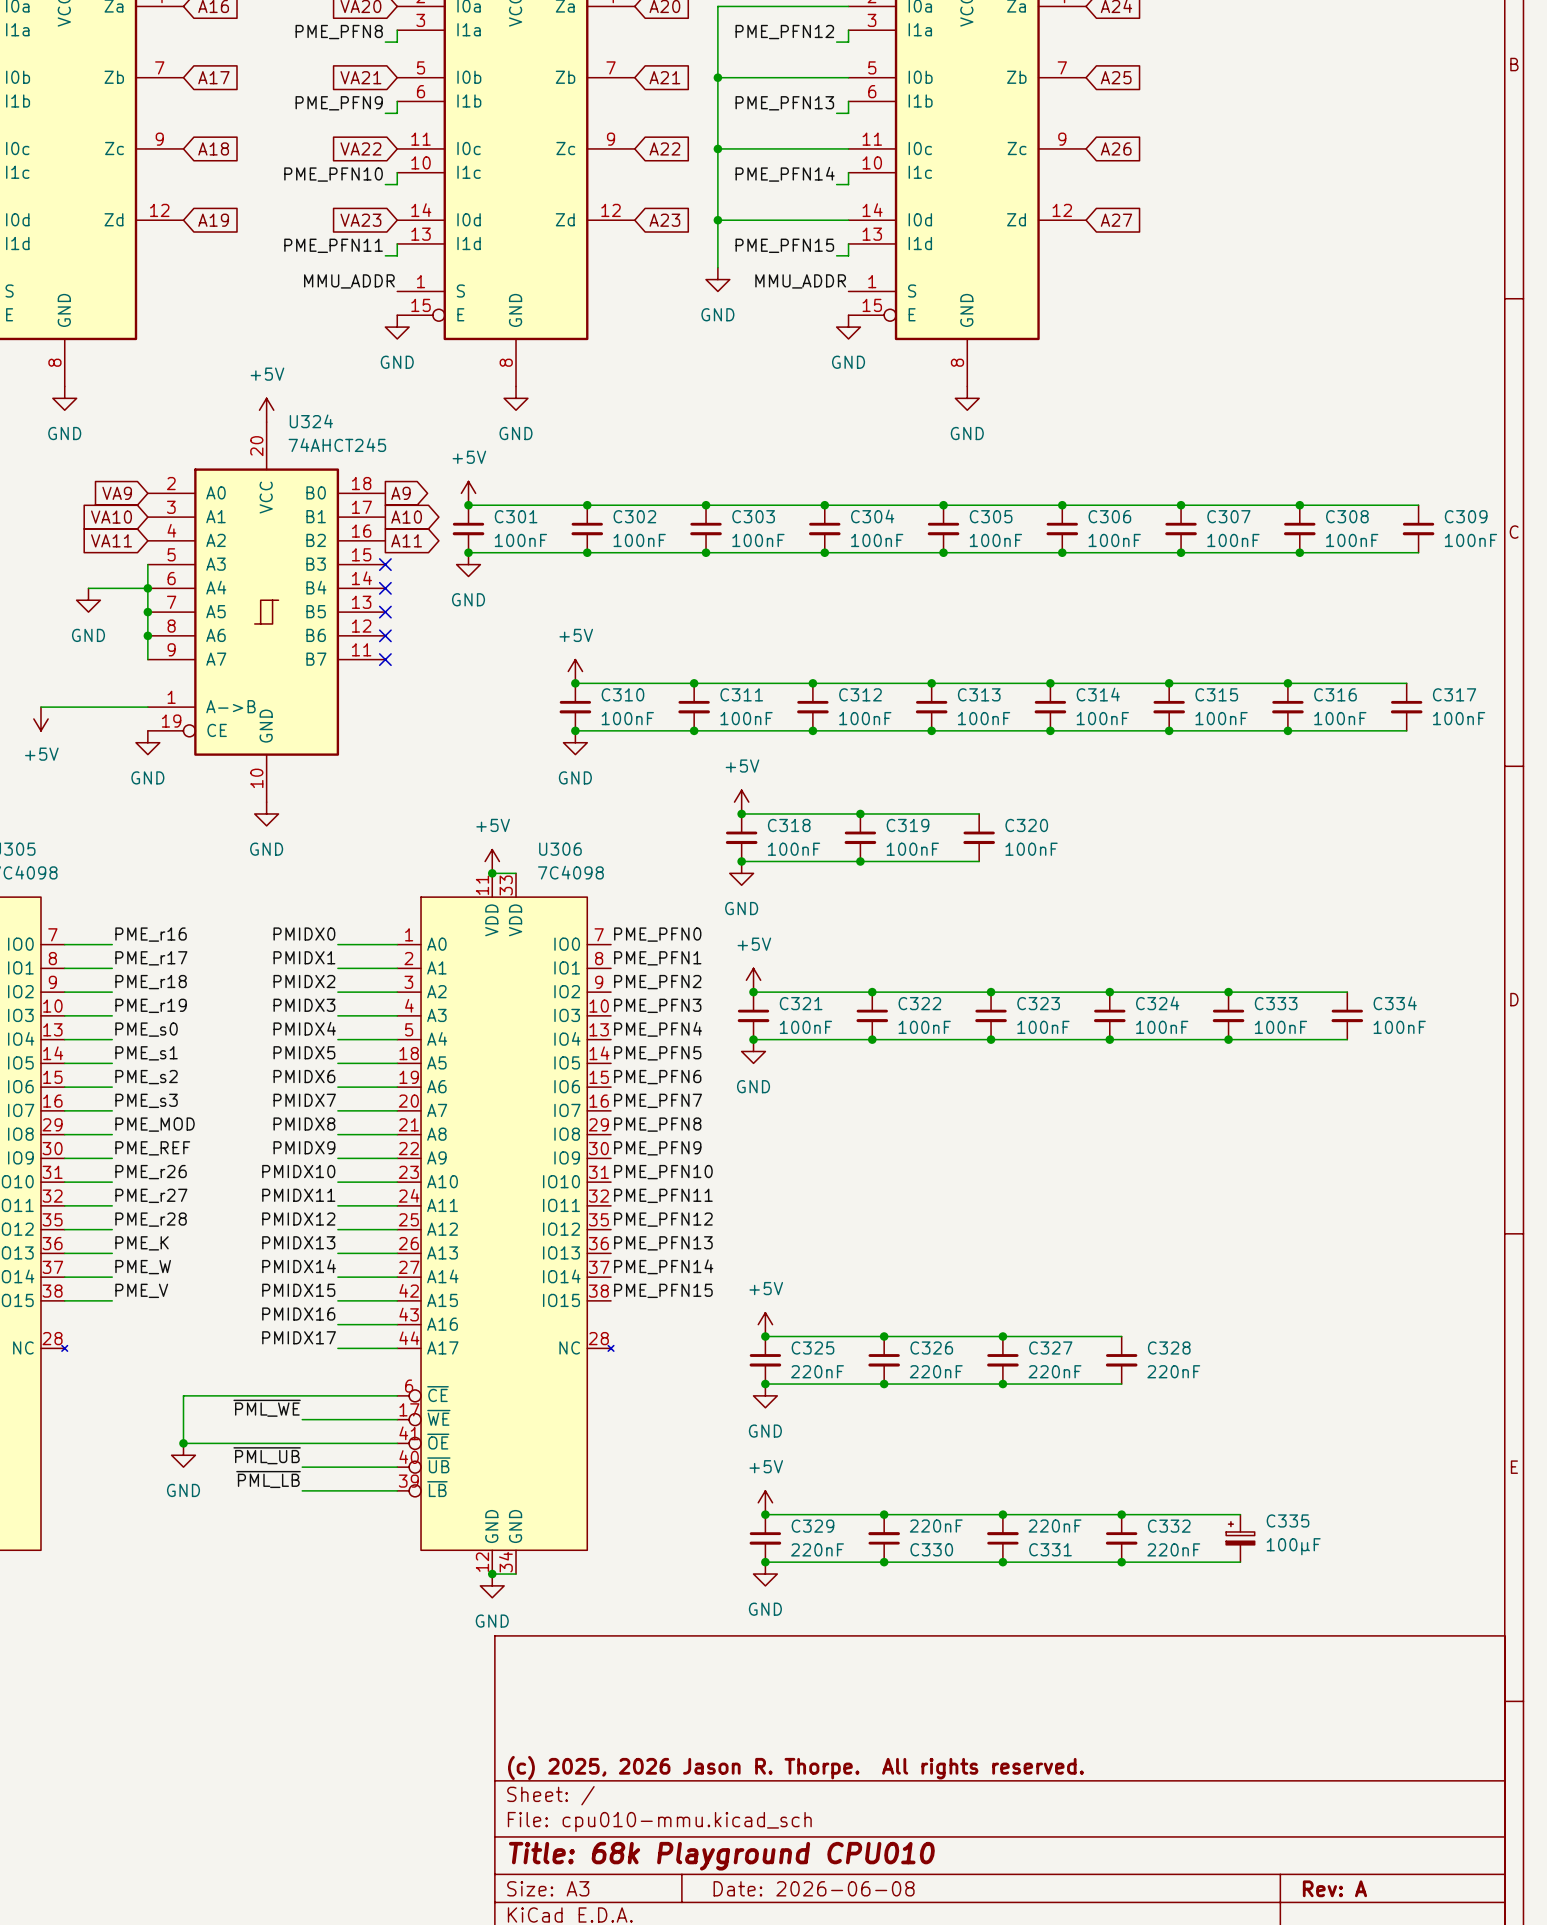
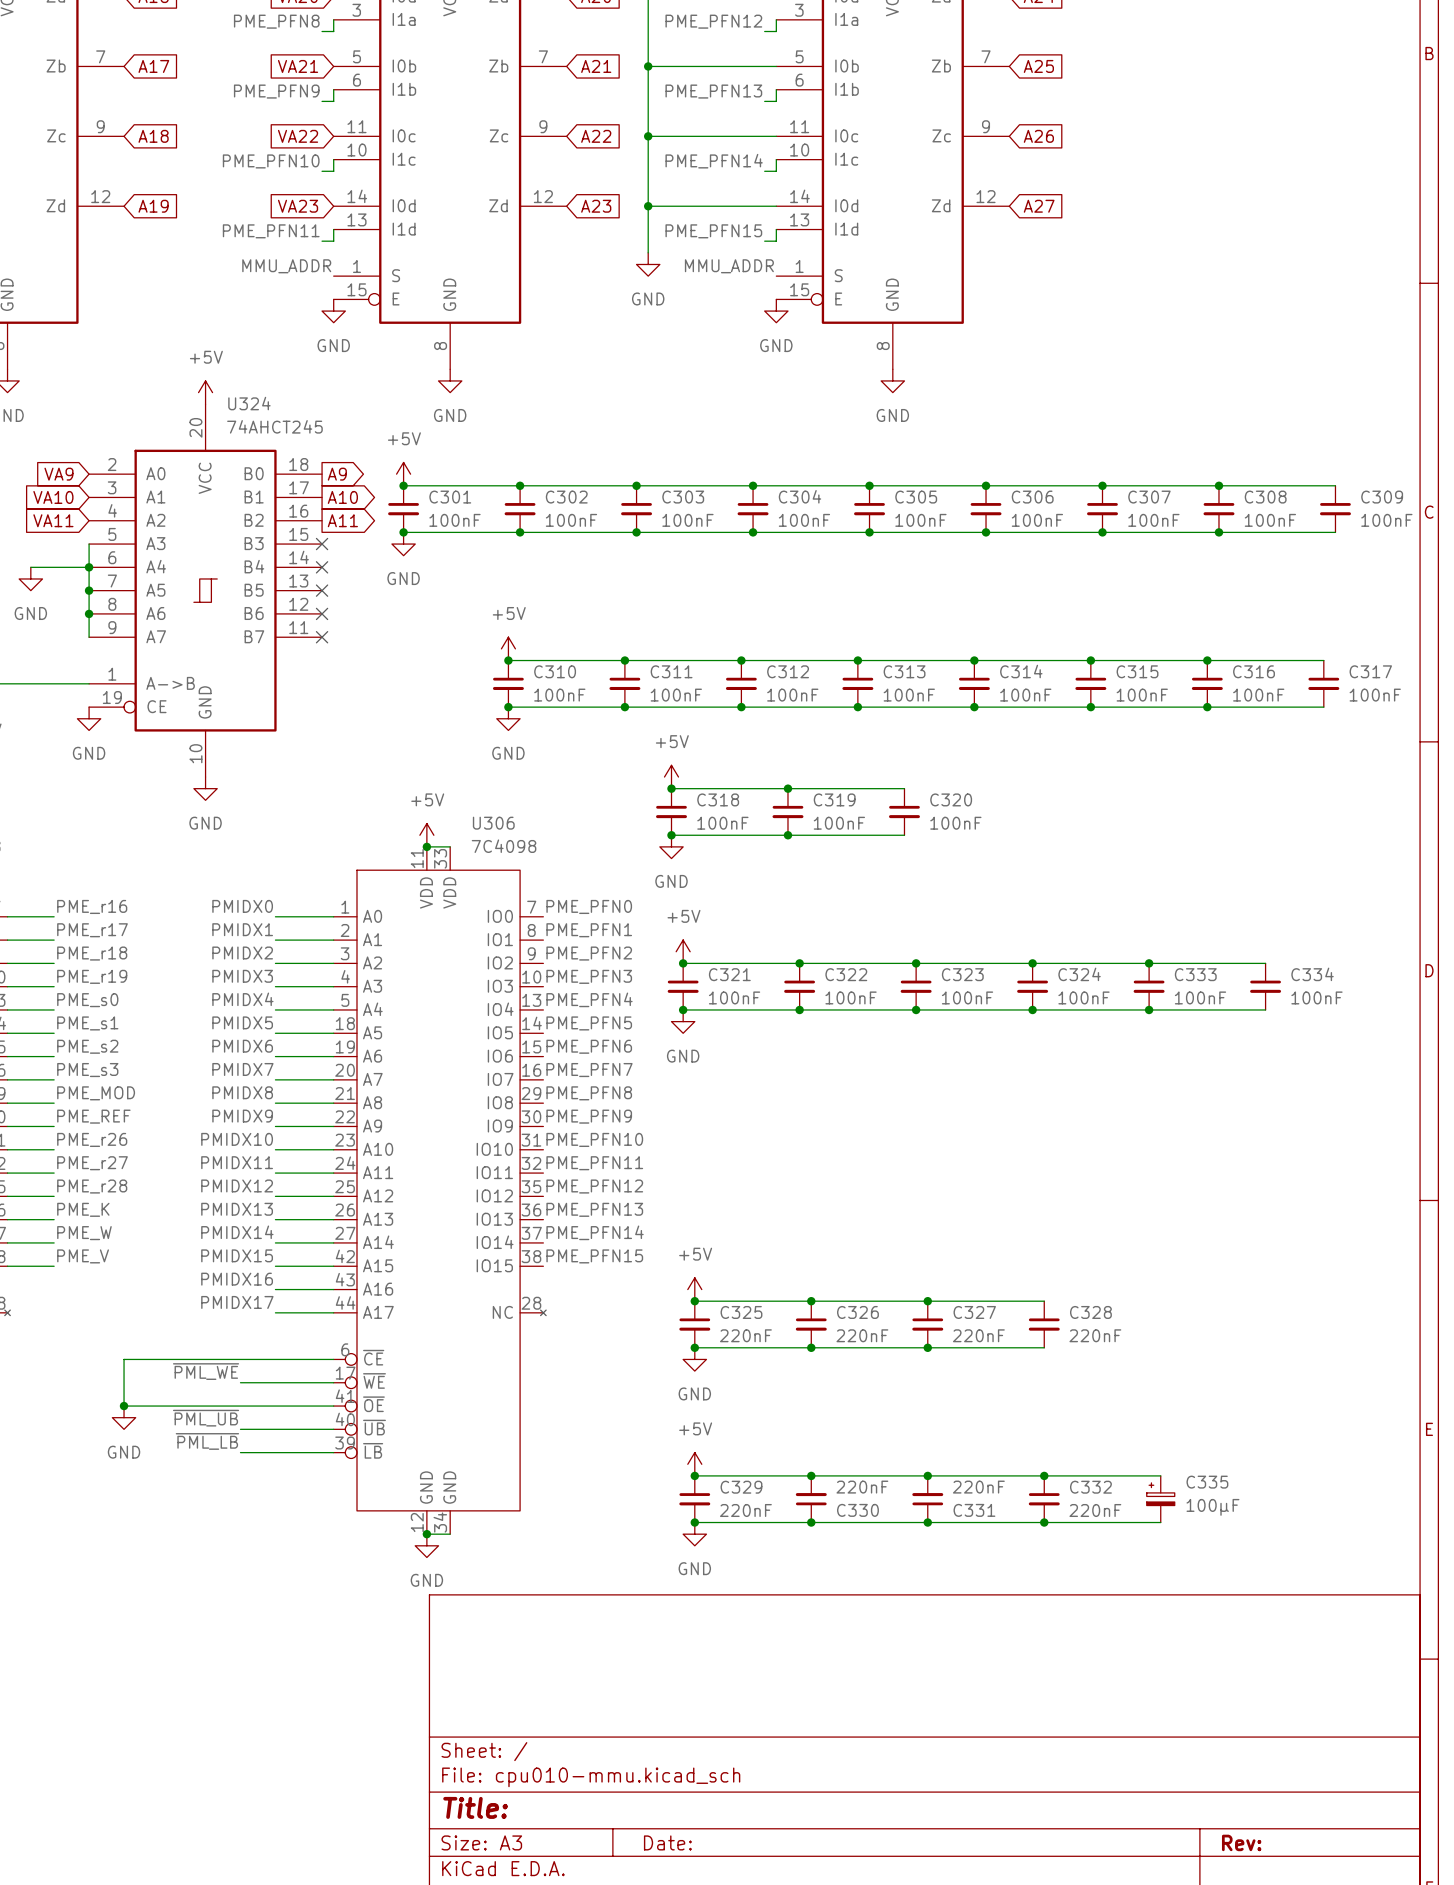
title block: (c) 2025, 2026 Jason R. Thorpe. All rights reserved. (795, 1767) -> none
title block: Title: 68k Playground CPU010 (721, 1856) -> Title: (475, 1807)
title block: Date: 2026-06-08 (814, 1888) -> Date: (667, 1842)
title block: Rev: A (1334, 1888) -> Rev: (1241, 1842)

